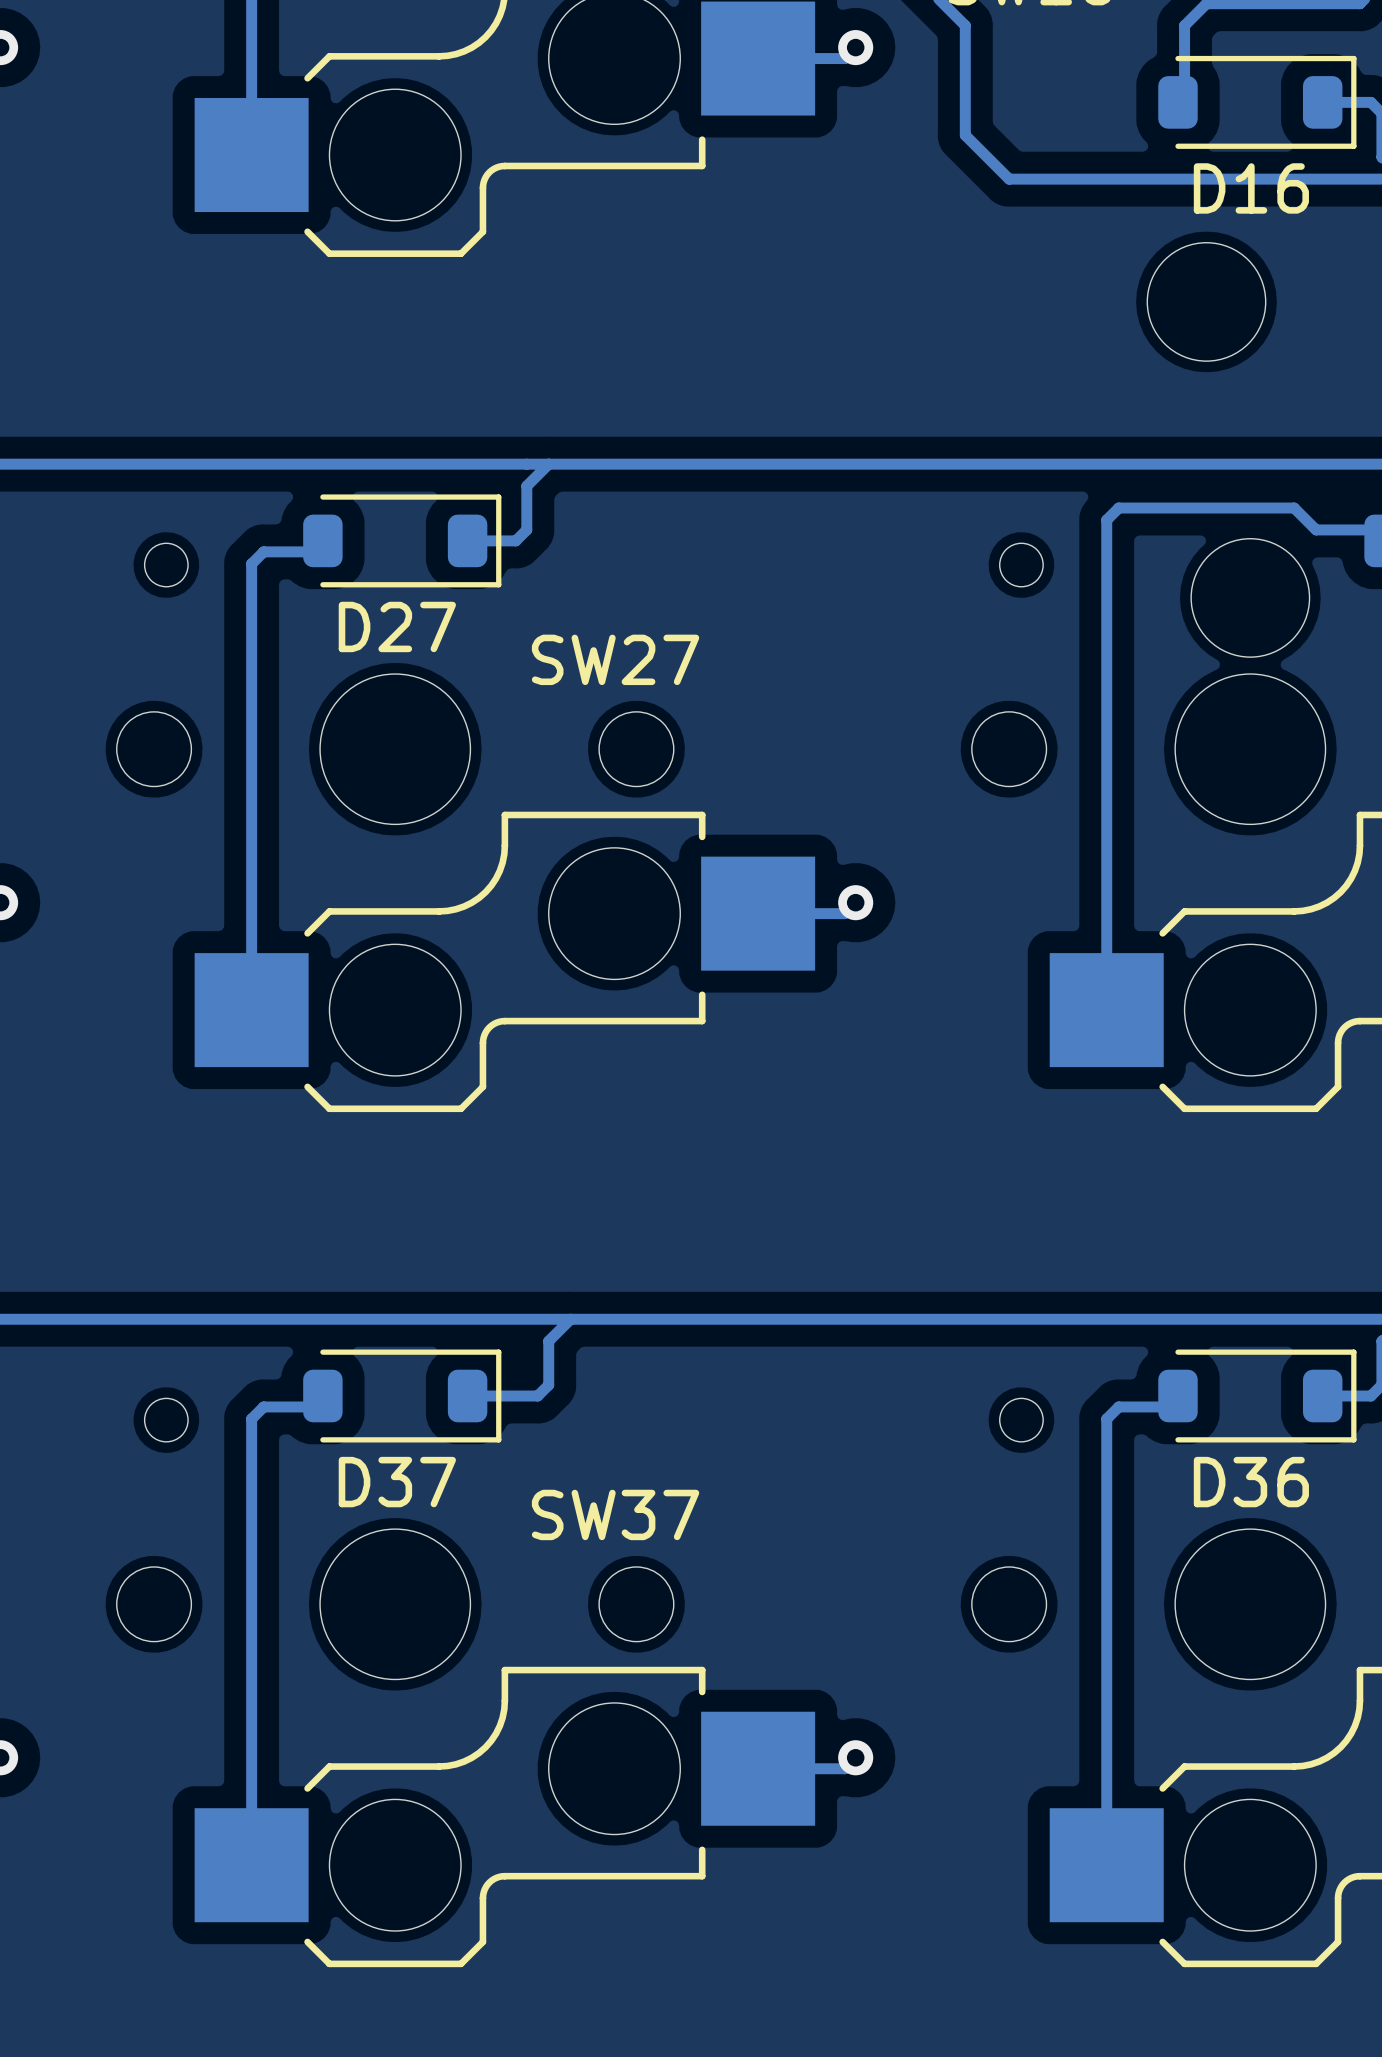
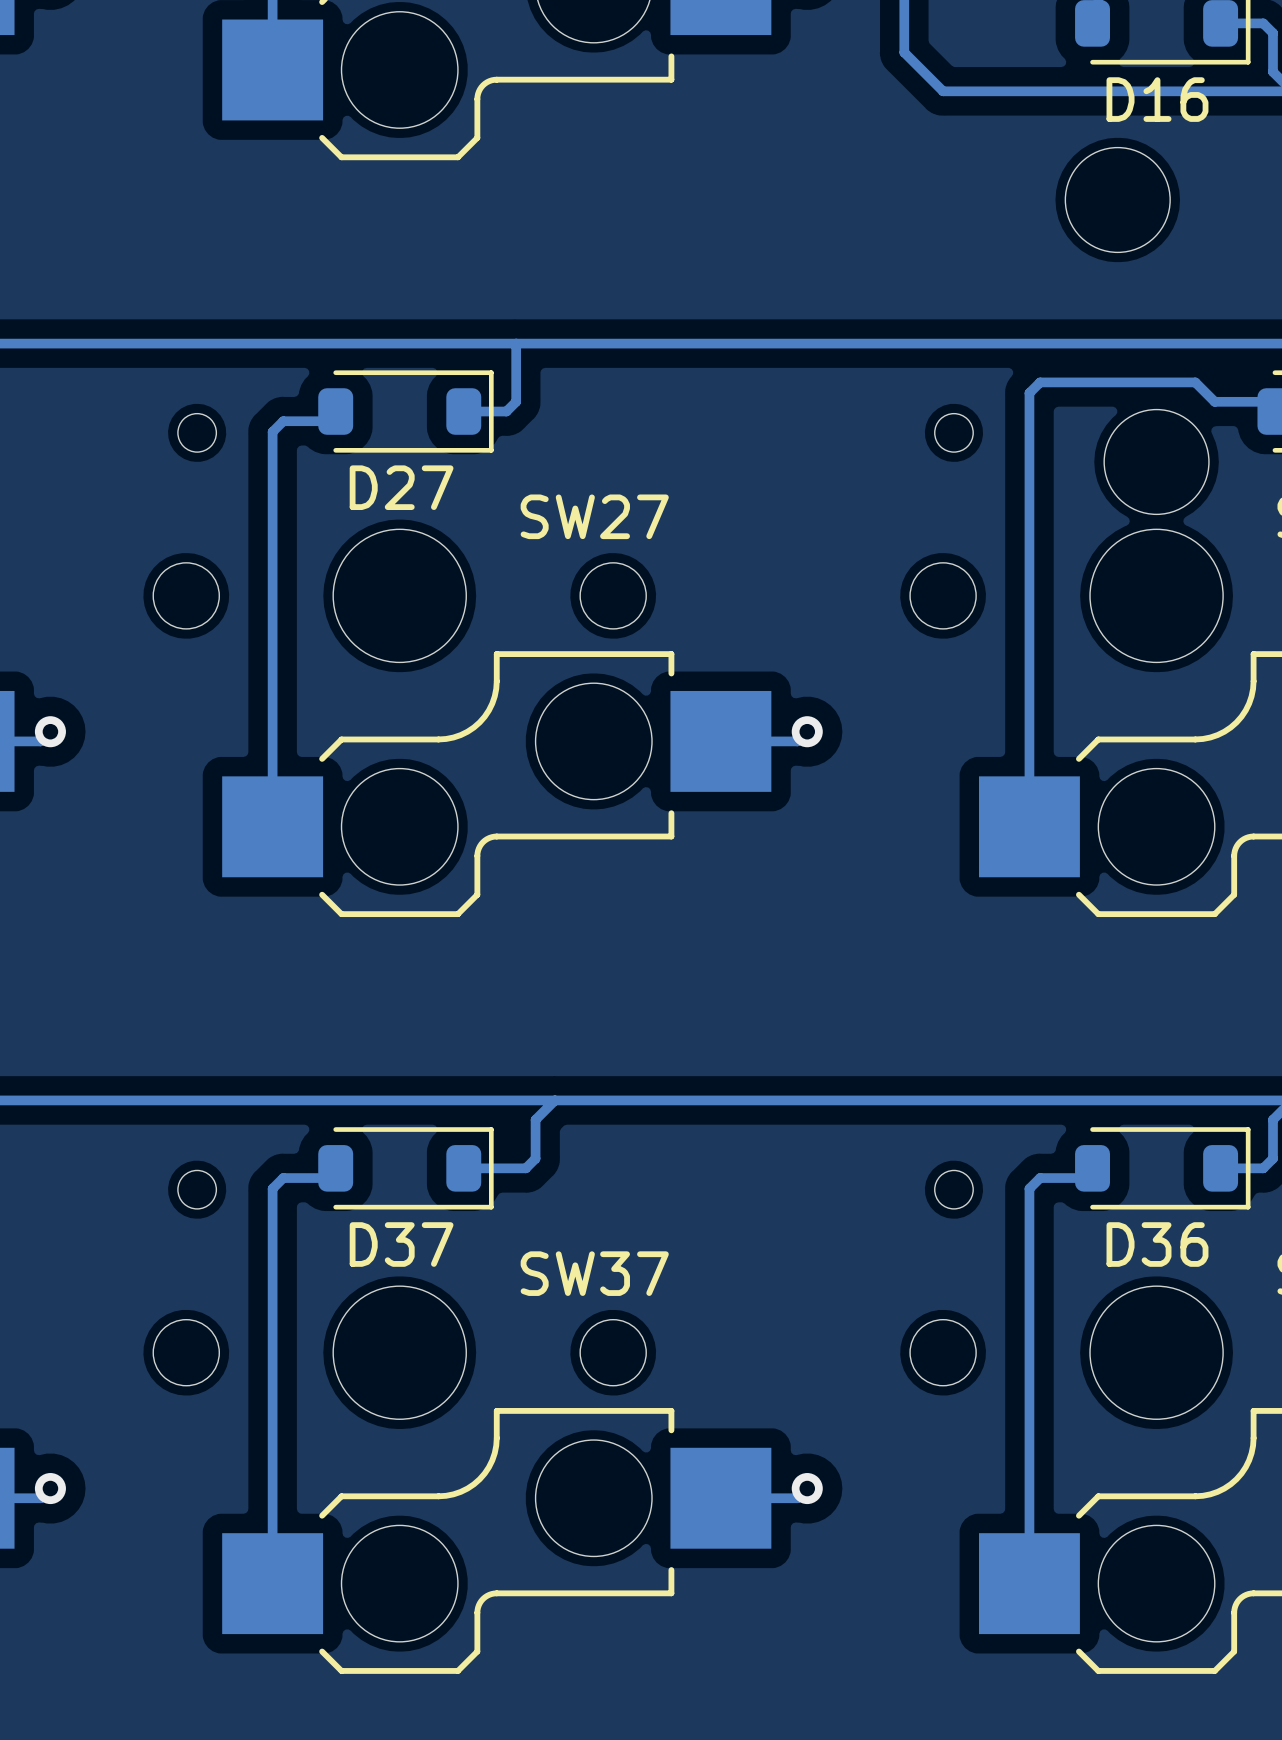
track: (548, 464) (526, 486) -> (516, 343) (516, 363)

